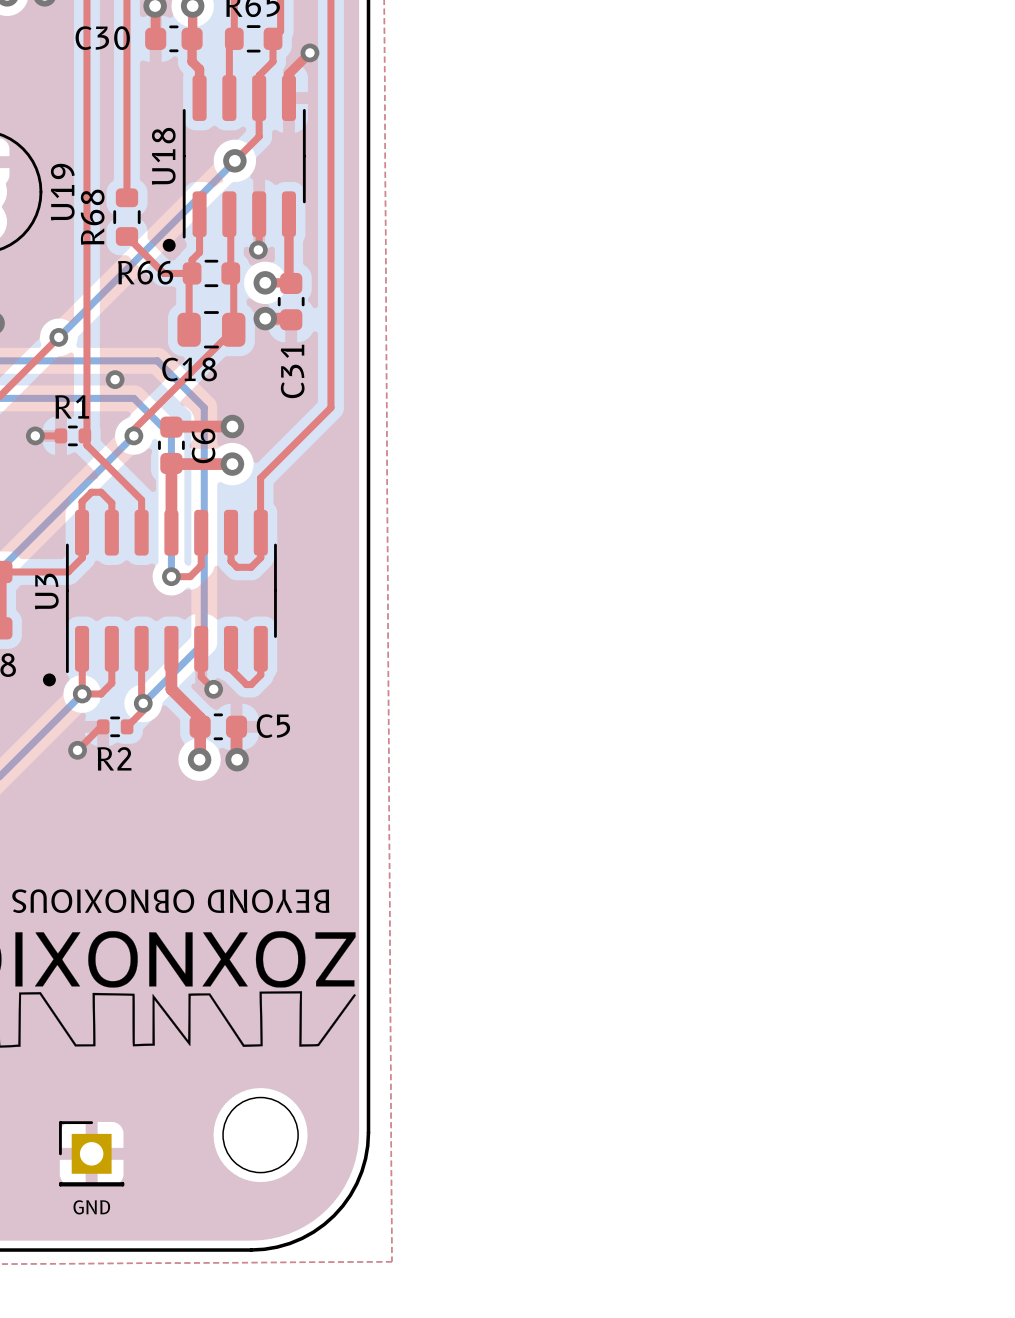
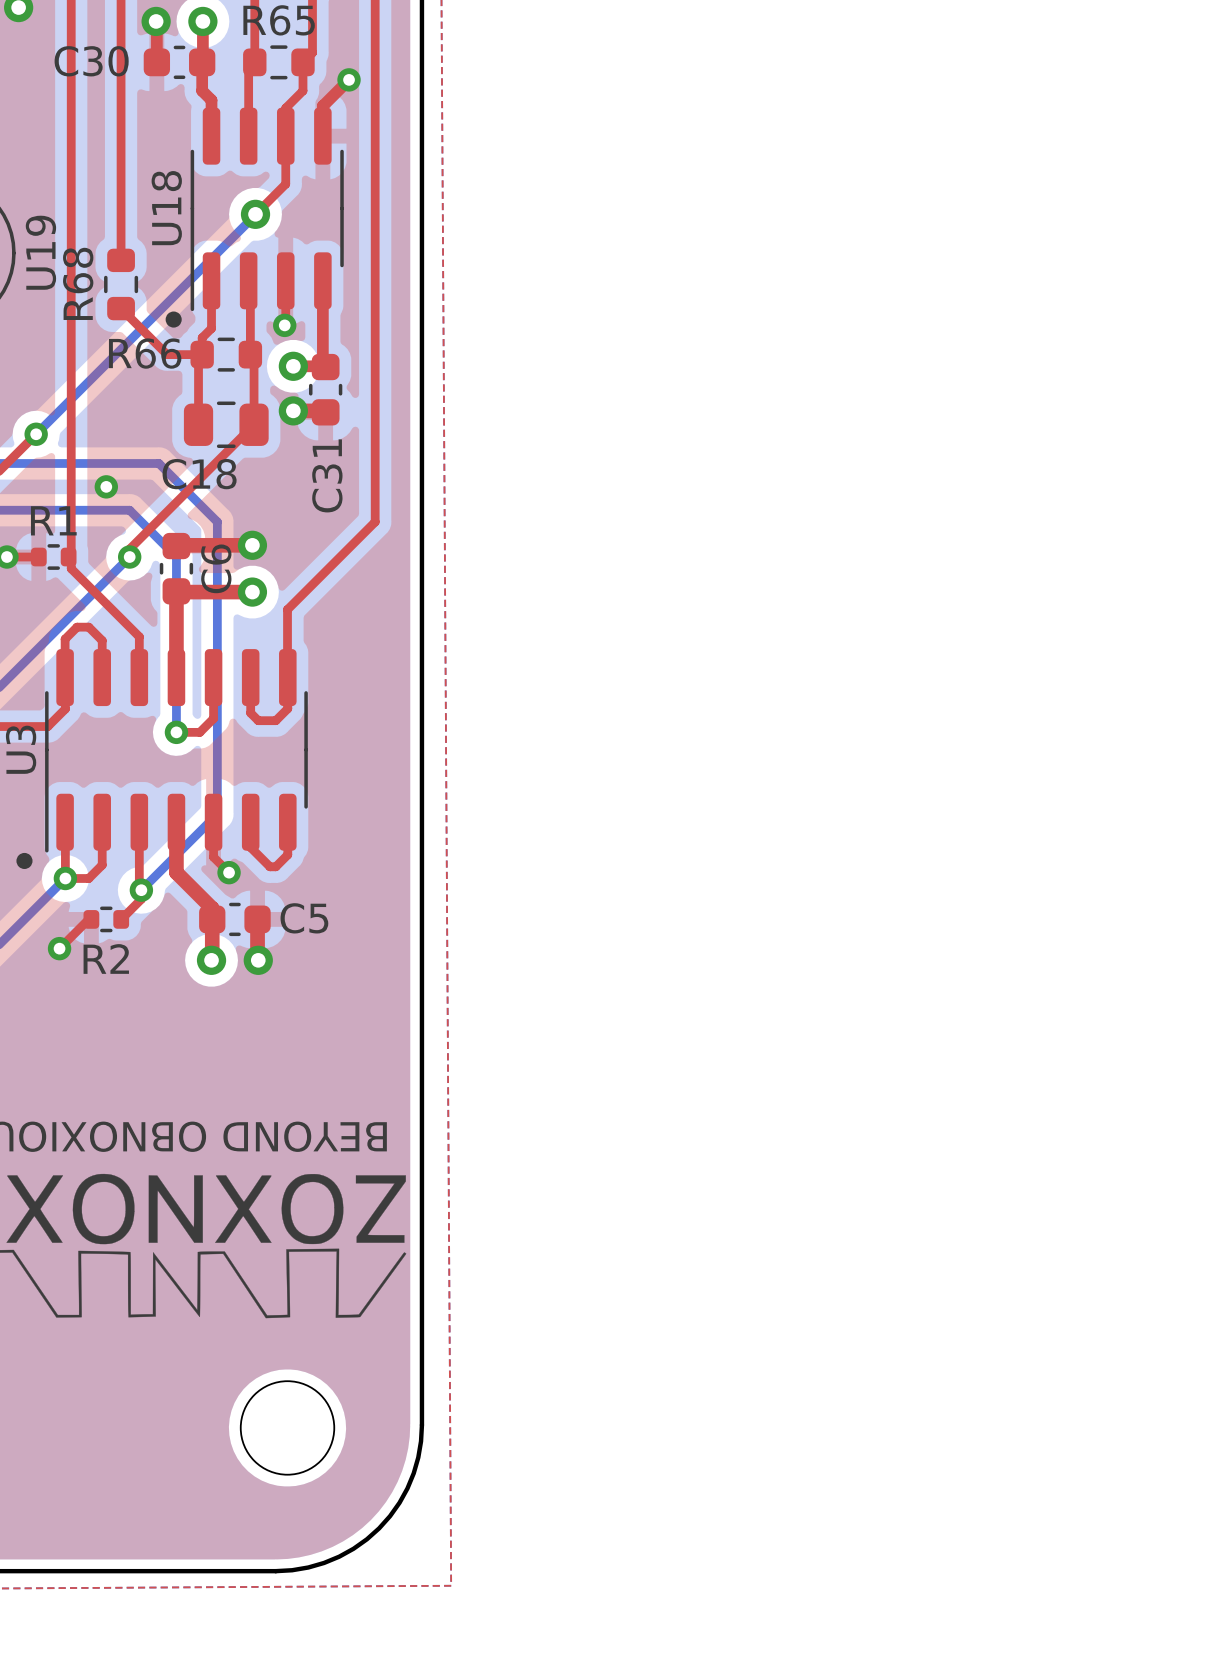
part: (91, 1153) -> none
text: GND (91, 1207) -> none

